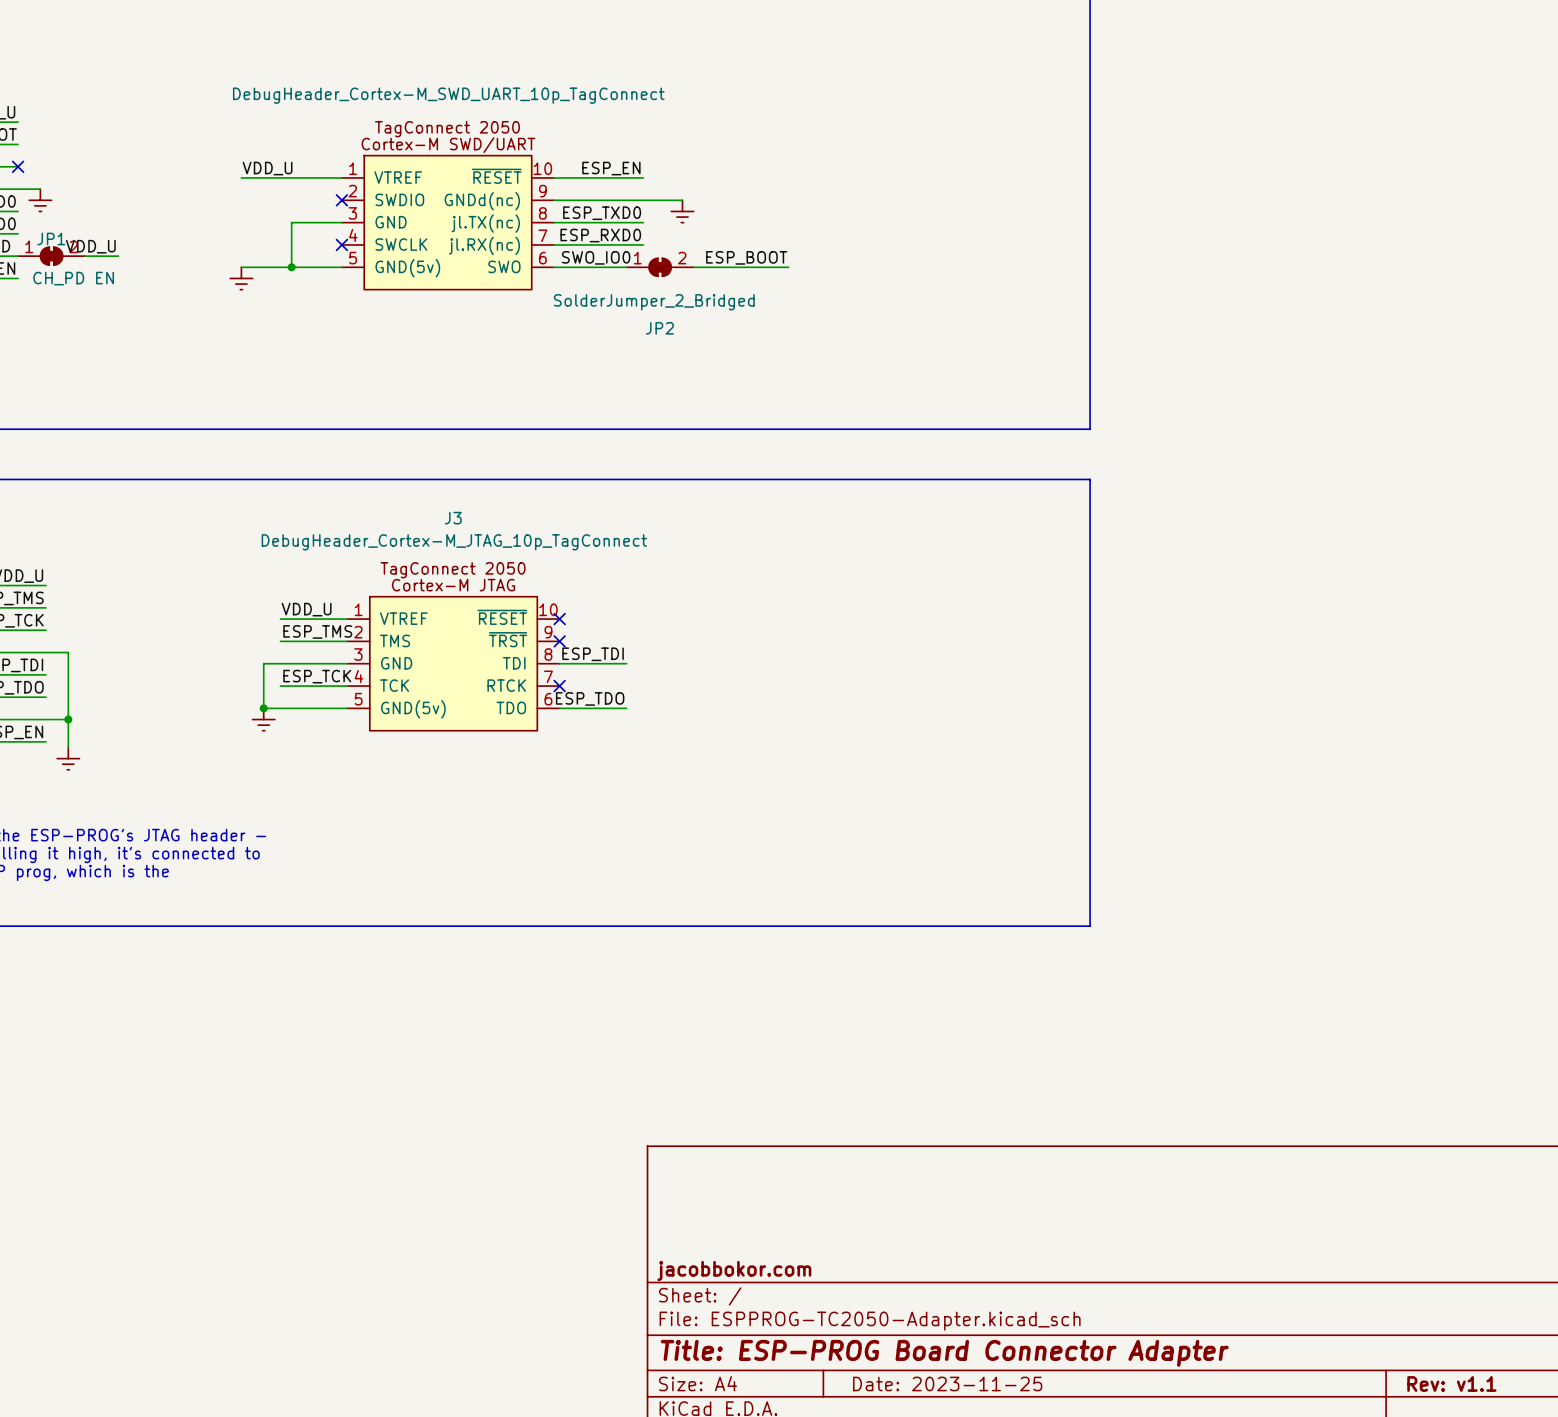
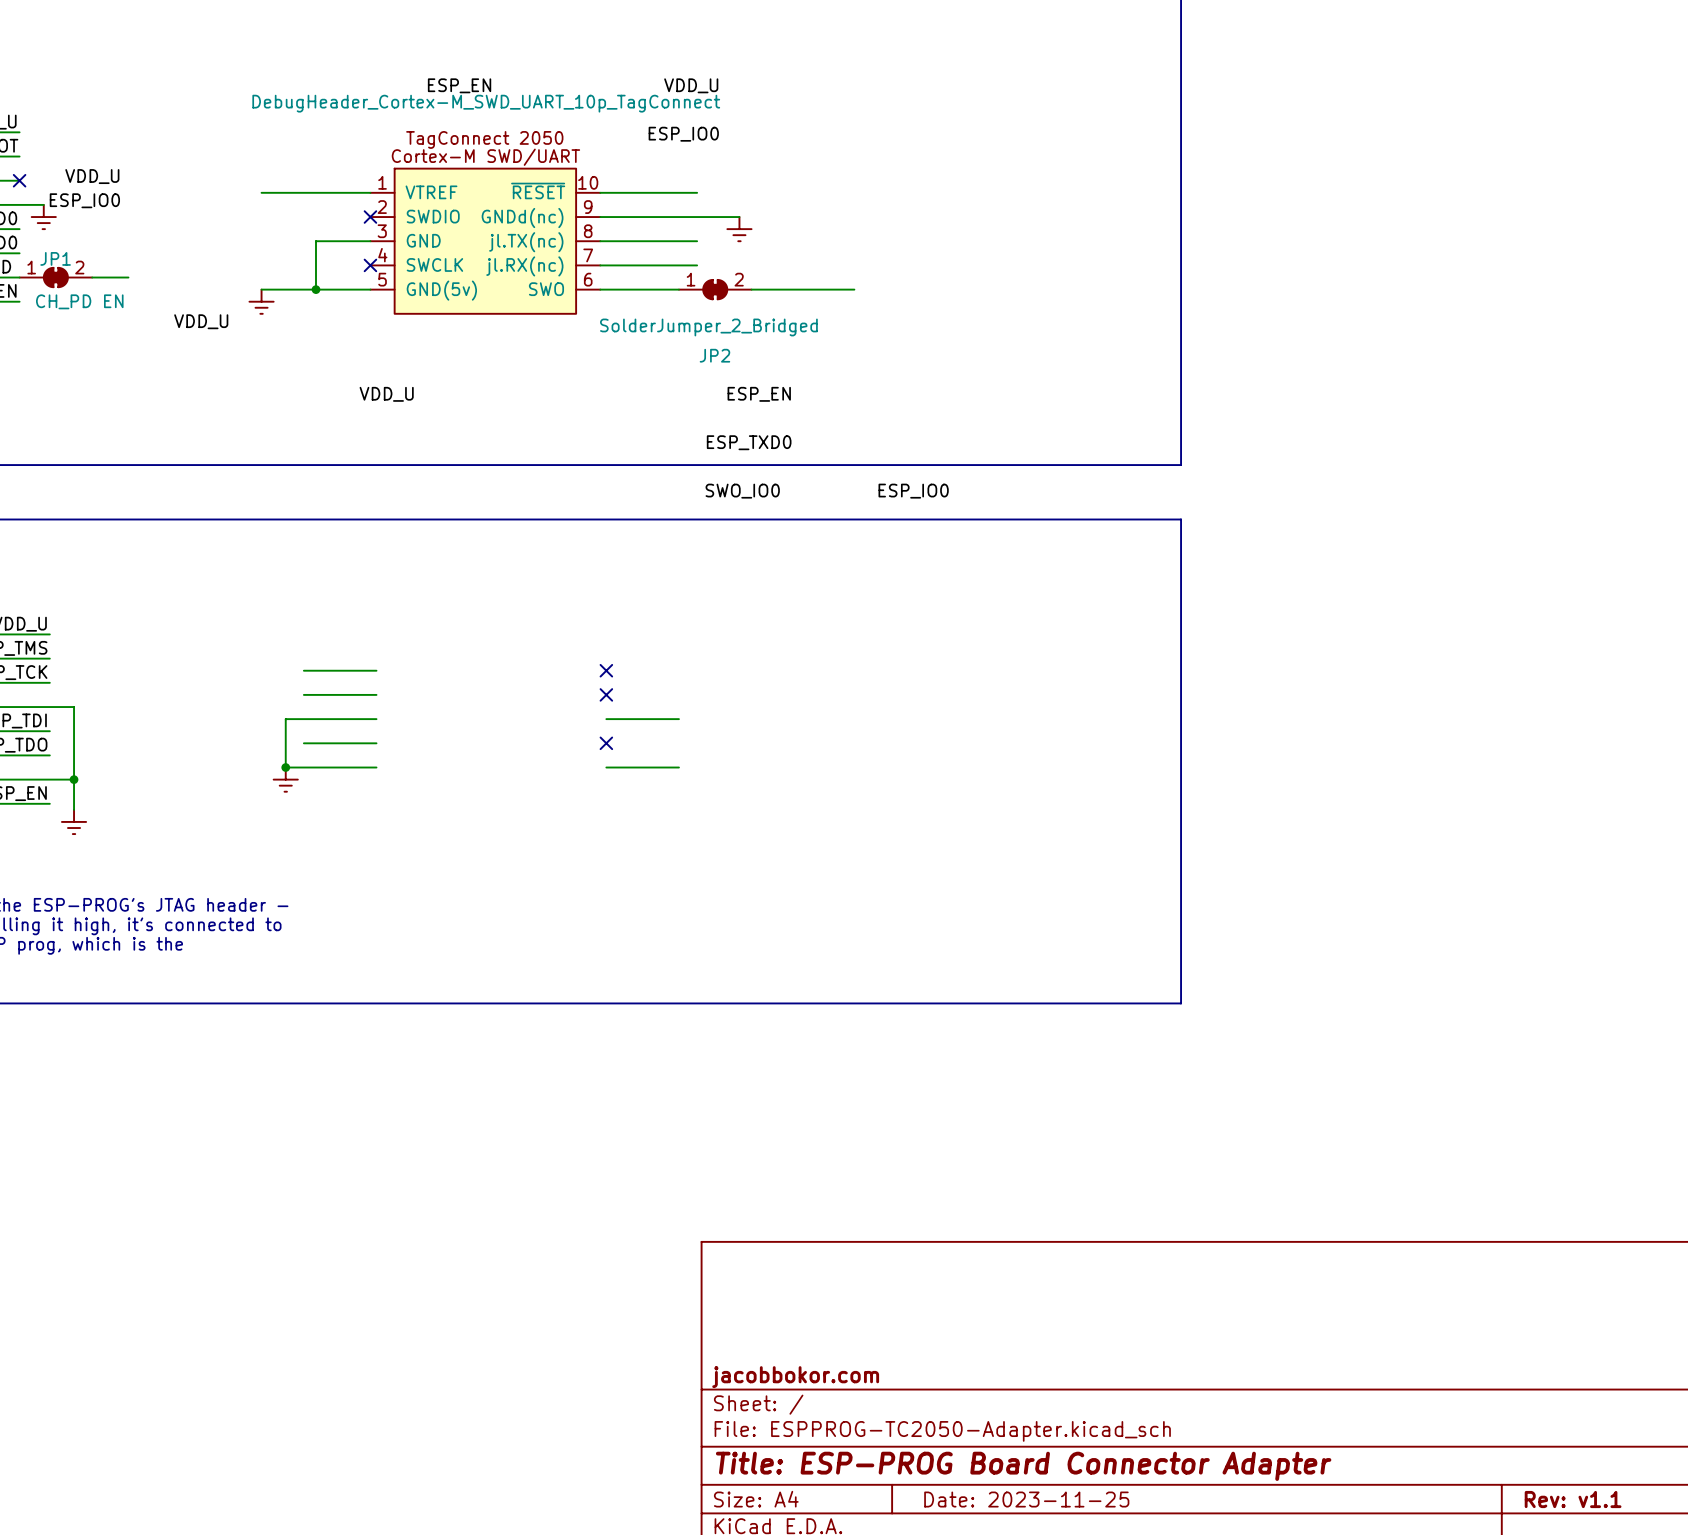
label: none -> ESP_EN (459, 85)
label: none -> VDD_U (691, 85)
label: none -> ESP_IO0 (683, 134)
label: none -> VDD_U (92, 176)
label: VDD_U (267, 168) -> none
label: ESP_EN (611, 168) -> none
label: none -> ESP_IO0 (84, 200)
label position: ESP_TXD0 (602, 213) -> ESP_TXD0 (749, 442)
label: ESP_RXD0 (600, 235) -> none
label: VDD_U (90, 246) -> none
label position: SWO_IO0 (596, 257) -> SWO_IO0 (742, 491)
label: ESP_BOOT (746, 257) -> none
label: none -> VDD_U (201, 321)
label: none -> VDD_U (386, 394)
label: none -> ESP_EN (759, 394)
label: none -> ESP_IO0 (913, 491)
label: VDD_U (306, 609) -> none
label: ESP_TMS (317, 631) -> none
label: ESP_TDI (593, 654) -> none
J3: DebugHeader_Cortex-M_JTAG_10p_TagConnect (453, 663) -> none
label: ESP_TCK (317, 676) -> none
label: ESP_TDO (590, 698) -> none

